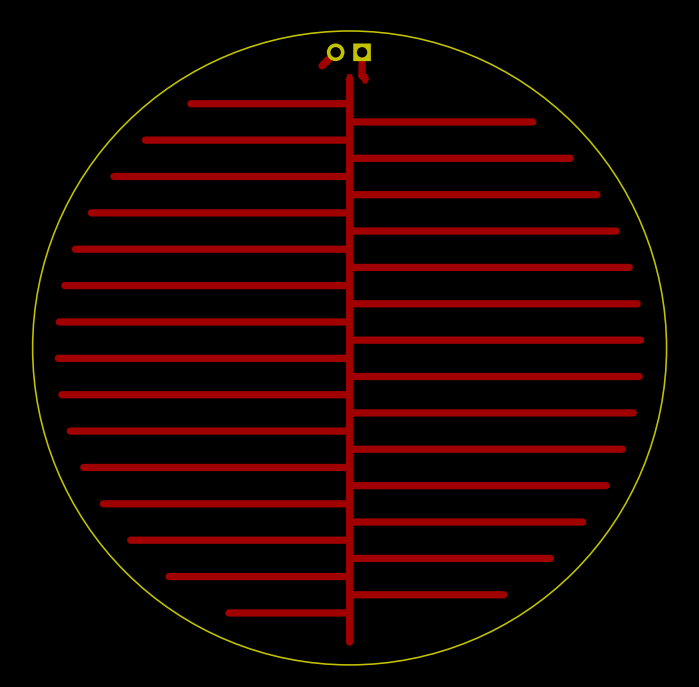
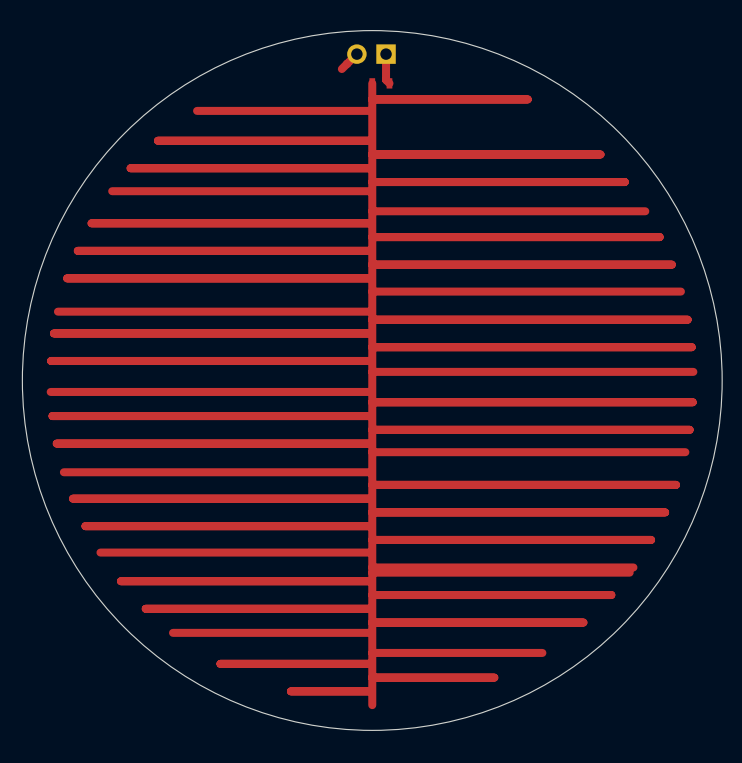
top track: none -> (527, 99) (372, 99)
top track: (532, 121) (349, 121) -> none
top track: none -> (371, 140) (157, 140)
top track: (349, 140) (145, 140) -> none
top track: none -> (600, 154) (372, 154)
top track: none -> (371, 168) (130, 168)
top track: (570, 158) (349, 158) -> none
top track: none -> (624, 182) (372, 182)
top track: none -> (371, 223) (91, 223)
top track: (349, 212) (91, 212) -> none
top track: none -> (659, 237) (372, 237)
top track: none -> (371, 250) (77, 250)
top track: (616, 231) (349, 231) -> none
top track: none -> (671, 264) (372, 264)
top track: (349, 249) (75, 249) -> none
top track: none -> (371, 278) (67, 278)
top track: none -> (687, 319) (372, 319)
top track: (637, 303) (349, 303) -> (689, 429) (372, 429)
top track: none -> (371, 333) (53, 333)
top track: (349, 321) (59, 321) -> none
top track: none -> (371, 360) (51, 360)
top track: none -> (692, 402) (372, 402)
top track: (639, 376) (349, 376) -> (691, 347) (372, 347)
top track: none -> (371, 416) (52, 416)
top track: (349, 394) (61, 394) -> none
top track: none -> (371, 443) (56, 443)
top track: none -> (676, 484) (372, 484)
top track: (622, 449) (349, 449) -> none
top track: none -> (371, 498) (73, 498)
top track: (349, 467) (83, 467) -> none
top track: none -> (665, 512) (372, 512)
top track: none -> (371, 526) (85, 526)
top track: (605, 485) (349, 485) -> none
top track: none -> (651, 539) (372, 539)
top track: none -> (633, 567) (372, 567)
top track: none -> (371, 581) (120, 581)
top track: (349, 540) (130, 540) -> none
top track: none -> (611, 595) (372, 595)
top track: none -> (371, 608) (145, 608)
top track: (550, 558) (349, 558) -> none
top track: none -> (583, 622) (372, 622)
top track: none -> (371, 663) (220, 663)
top track: (349, 612) (228, 612) -> none
top track: none -> (494, 677) (372, 677)
top track: none -> (371, 691) (290, 691)

